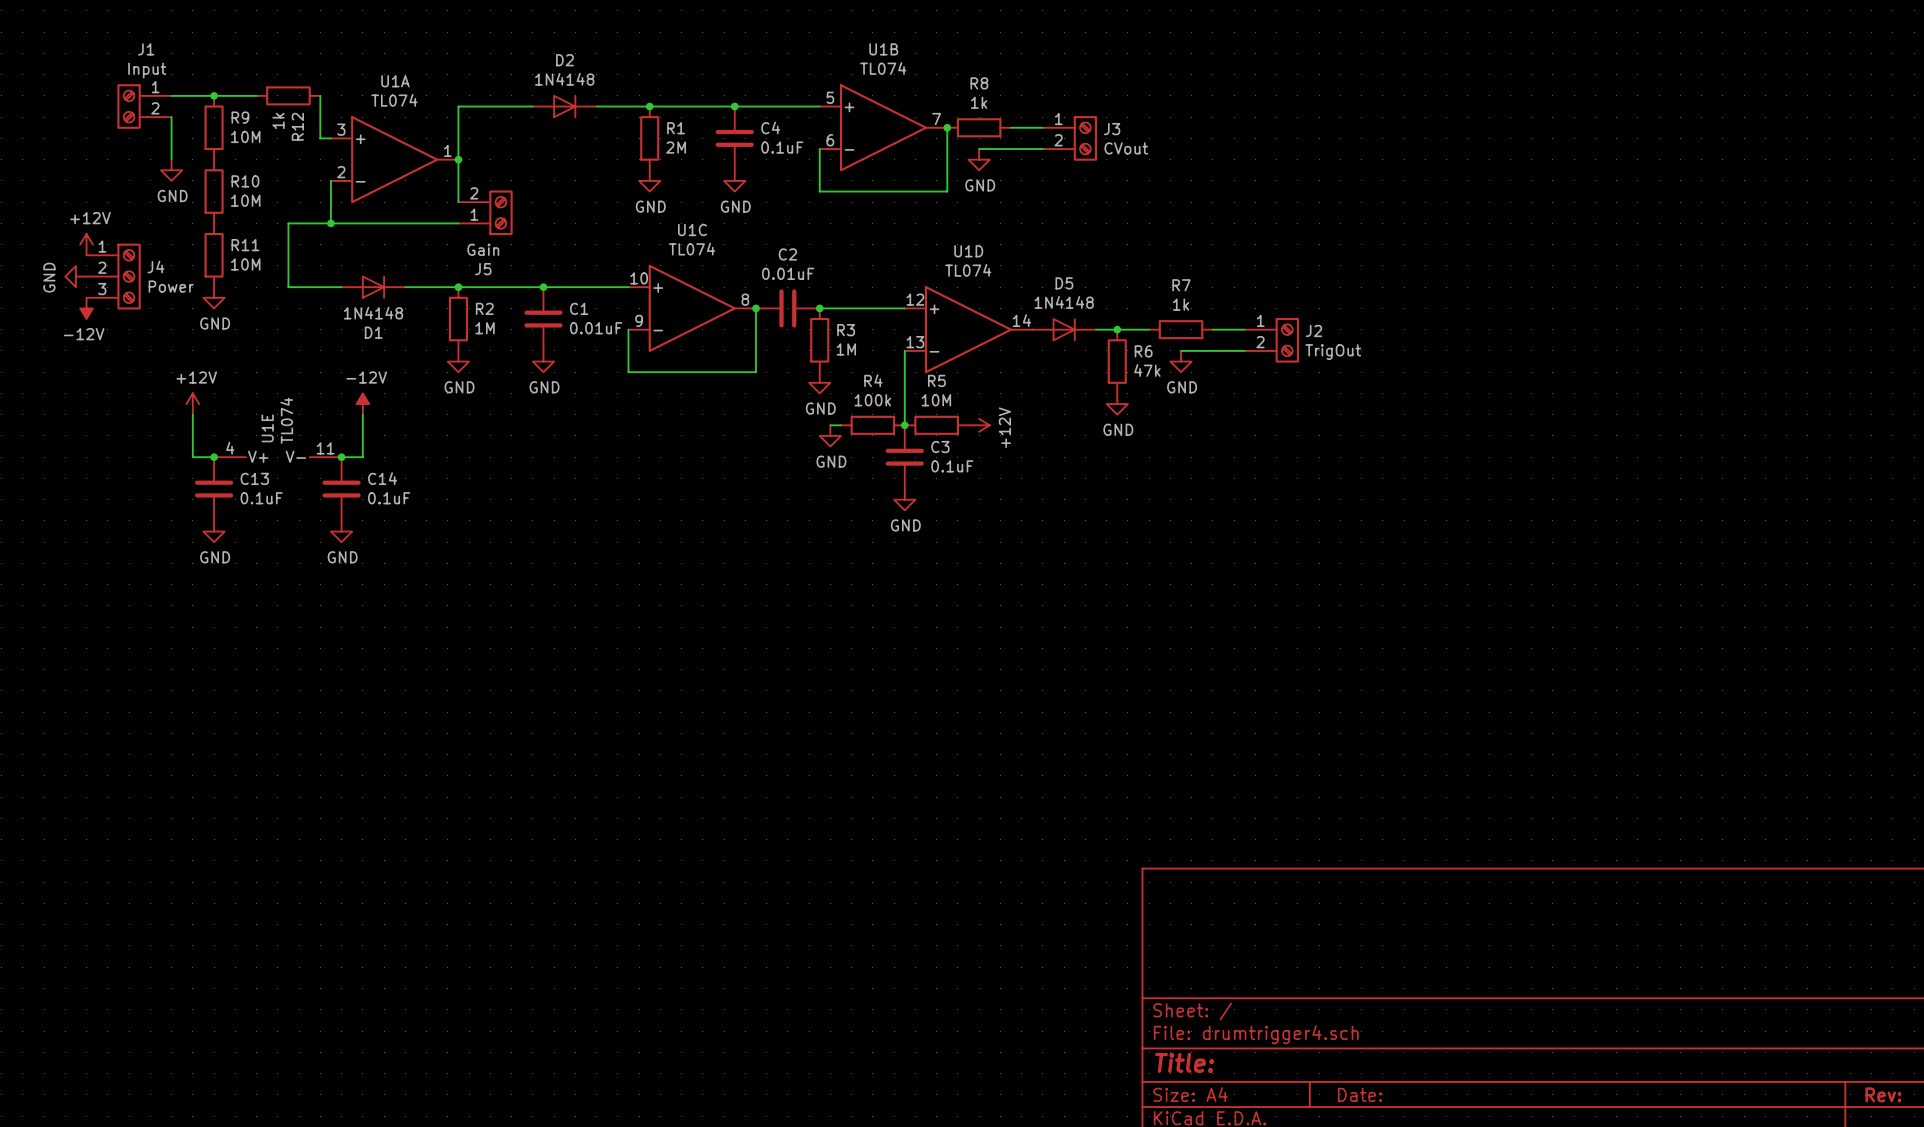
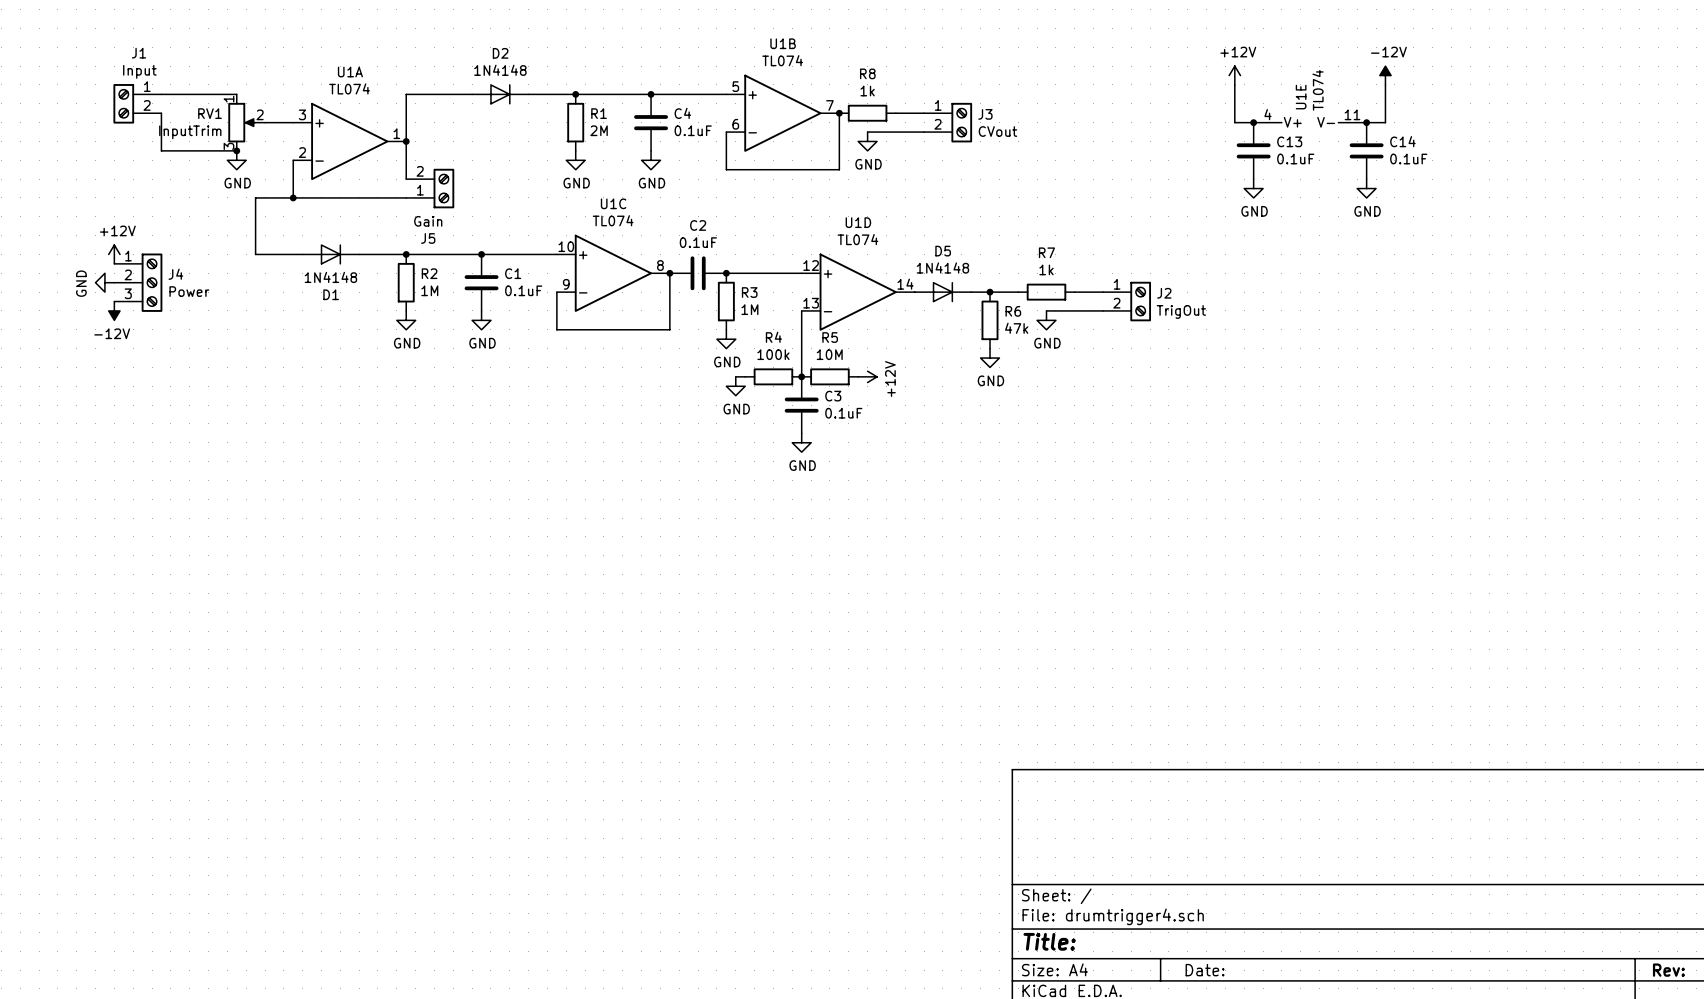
power symbol: none -> +12V (1234, 75)
power symbol: none -> -12V (1385, 75)
wire: (171, 95) (256, 95) -> (161, 94) (236, 94)
junction: (214, 95) -> none
R12: 1k (288, 95) -> none
wire: (320, 95) (320, 138) -> (265, 122) (283, 122)
wire: none -> (1234, 84) (1234, 122) (1253, 122)
wire: none -> (1385, 84) (1385, 122) (1366, 122)
J1 position: (144, 106) -> (137, 103)
wire: (171, 117) (171, 159) -> none
wire: none -> (161, 113) (161, 150) (236, 150)
R9: 10M (214, 127) -> none
RV1: none -> InputTrim (246, 122)
junction: none -> (1253, 122)
junction: none -> (1366, 122)
power symbol: GND (171, 170) -> none
junction: none -> (236, 150)
power symbol: none -> GND (236, 160)
R10: 10M (214, 191) -> none
power symbol: none -> GND (1253, 188)
power symbol: none -> GND (1366, 188)
power symbol position: +12V (86, 244) -> +12V (114, 254)
R11: 10M (214, 255) -> none
C2 value: 0.01uF (788, 273) -> 0.1uF (698, 242)
power symbol: GND (75, 276) -> none
J4 position: (113, 276) -> (138, 282)
power symbol: GND (214, 297) -> none
power symbol position: -12V (86, 308) -> -12V (114, 310)
power symbol: none -> GND (104, 282)
C1 value: 0.01uF (596, 328) -> 0.1uF (523, 290)
power symbol: +12V (192, 404) -> none
power symbol: -12V (362, 404) -> none
wire: (192, 414) (192, 457) (214, 457) -> none
wire: (362, 414) (362, 457) (341, 457) -> none
junction: (214, 457) -> none
U1E position: (277, 457) -> (1310, 122)
junction: (341, 457) -> none
C13 position: (214, 489) -> (1253, 150)
C14 position: (341, 489) -> (1366, 150)
power symbol: GND (214, 531) -> none
power symbol: GND (341, 531) -> none

